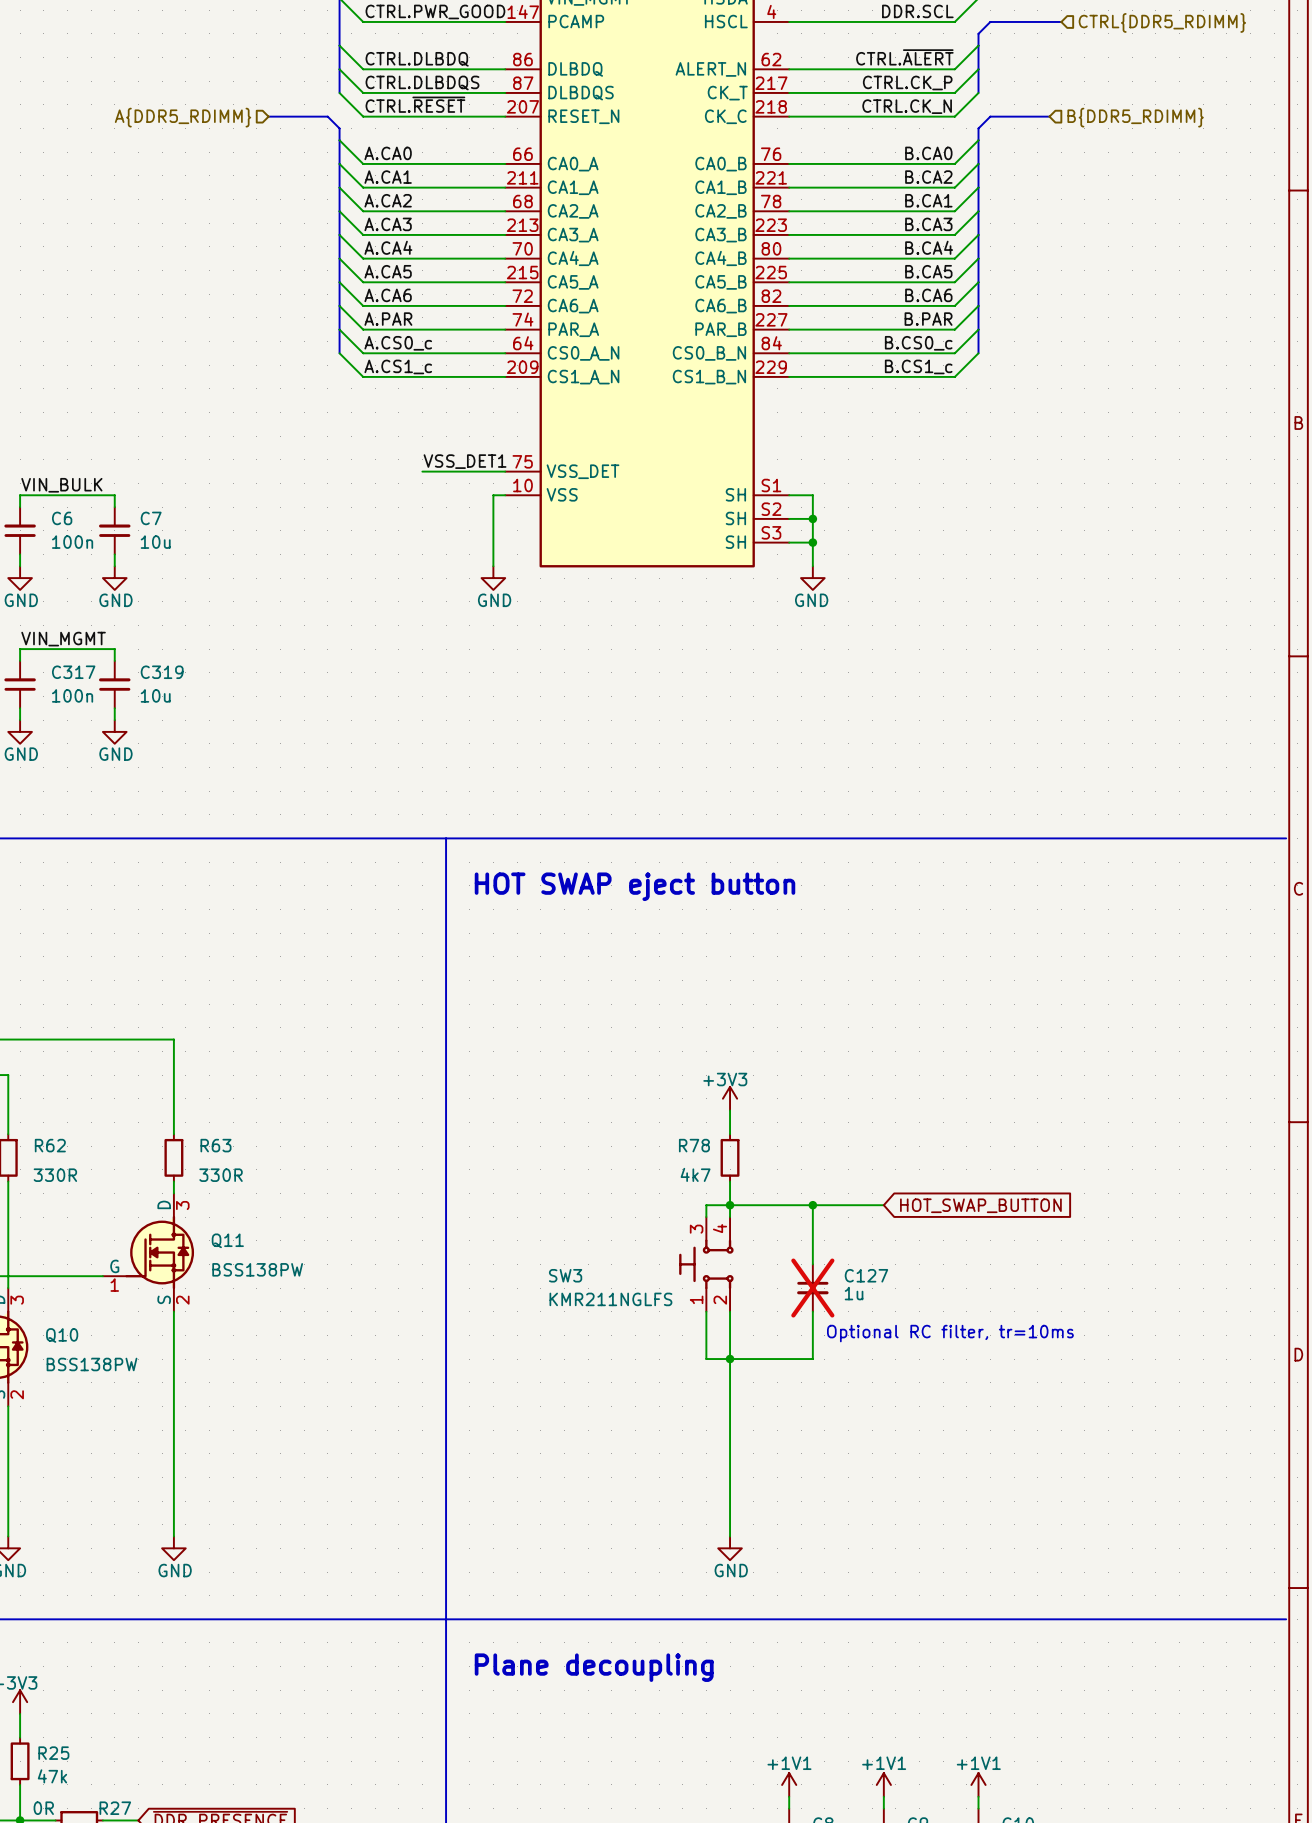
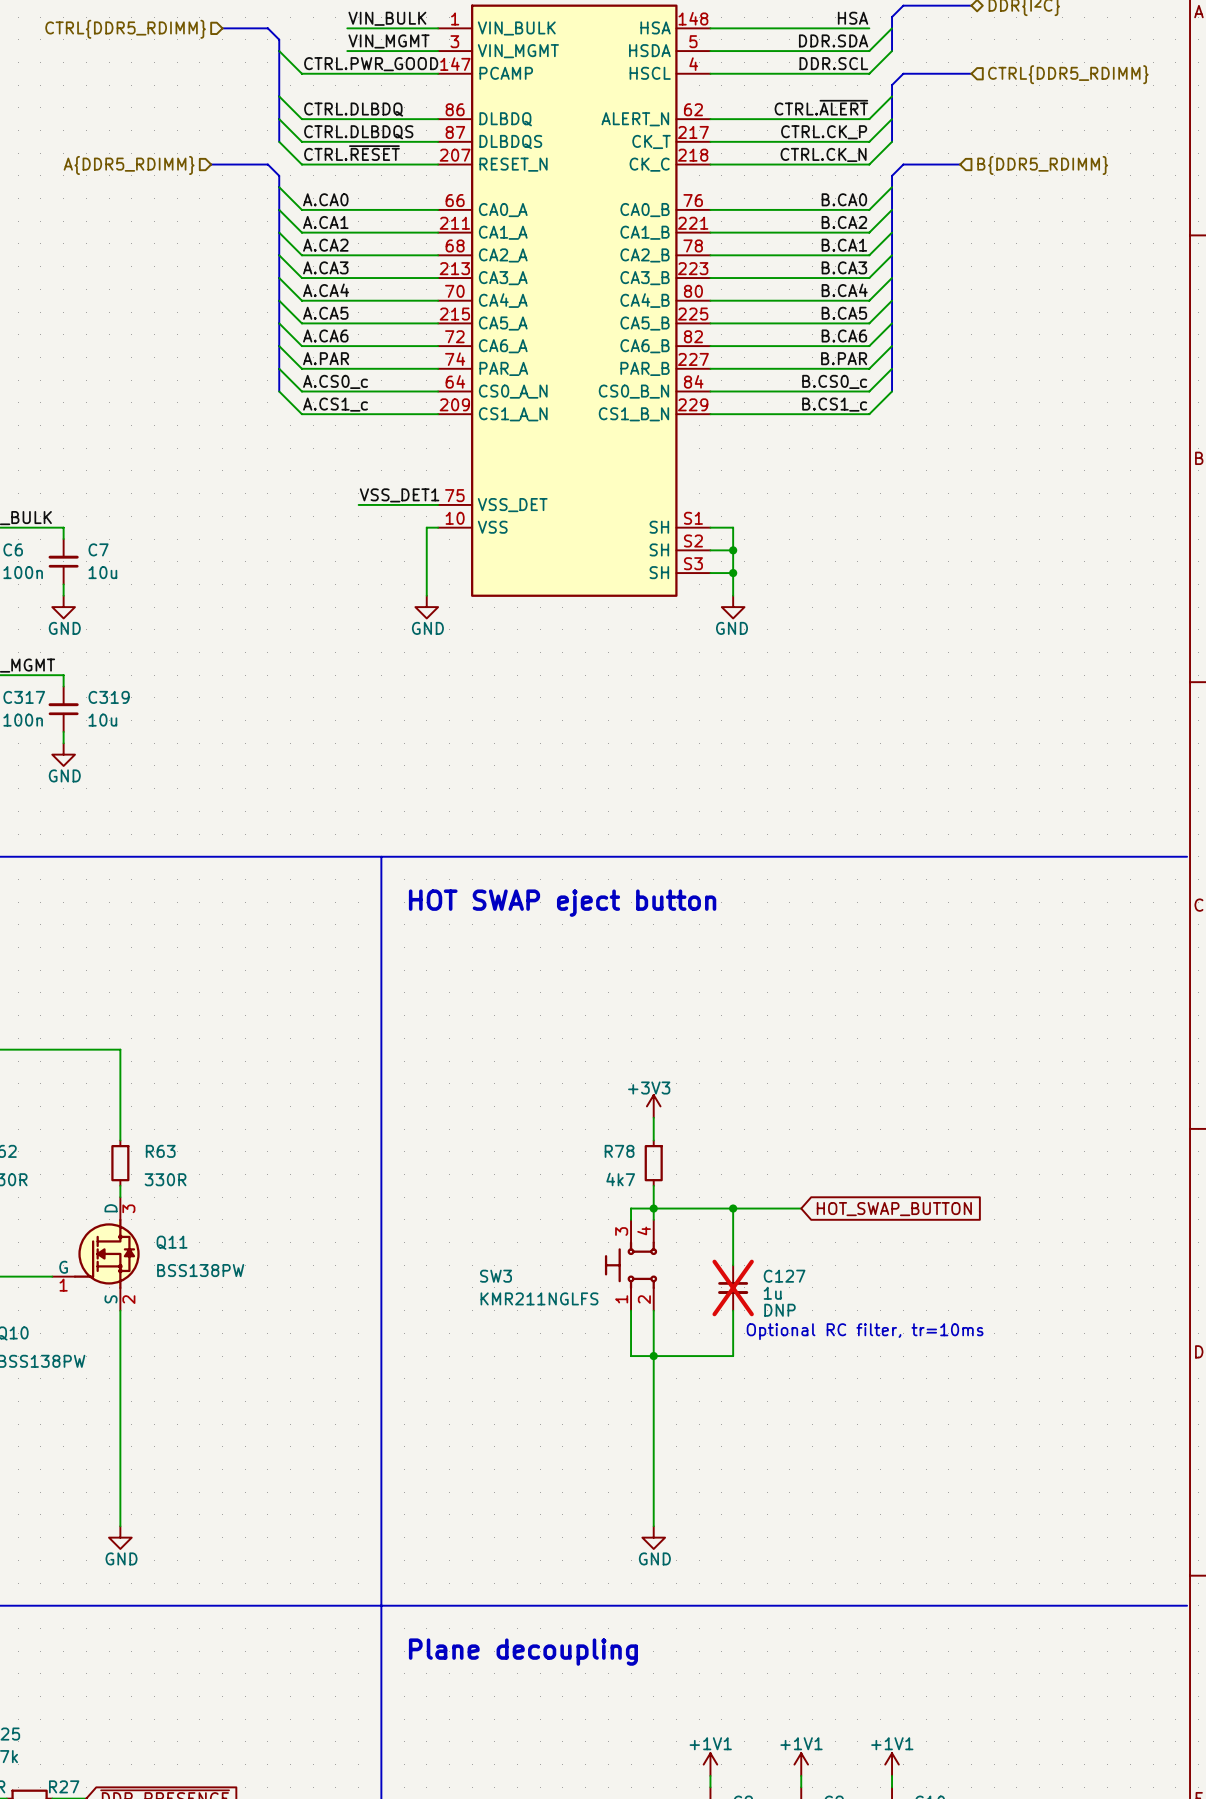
C127 text: none -> DNP (779, 1310)

